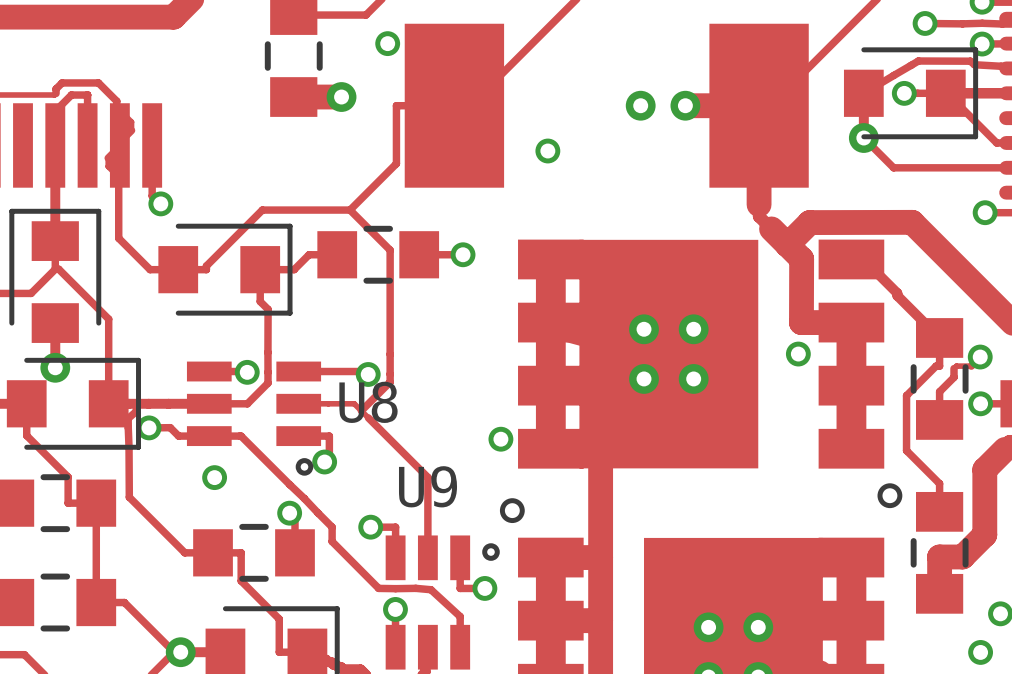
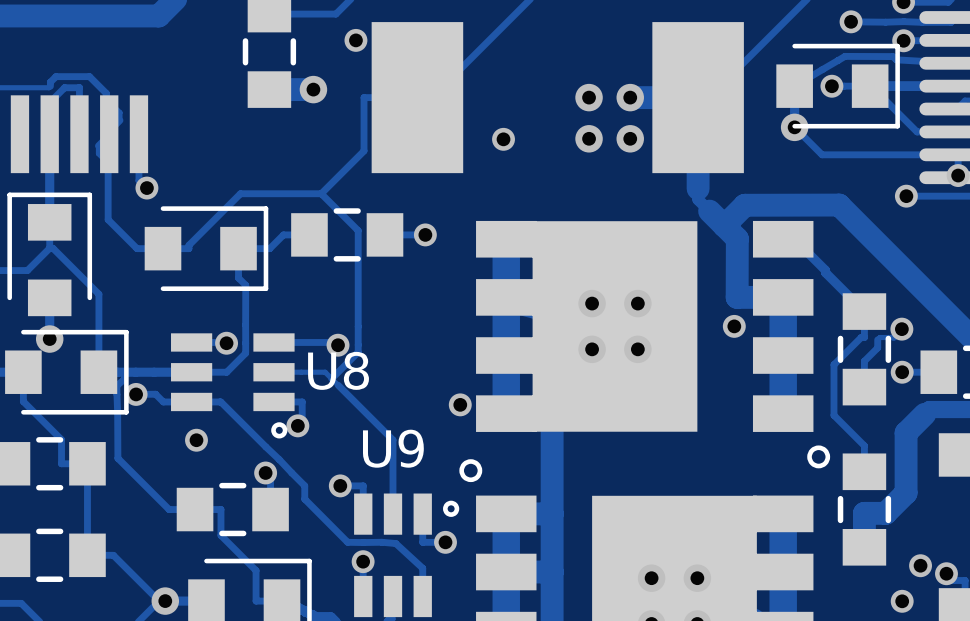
via: none -> (589, 138)
via: none -> (630, 138)

